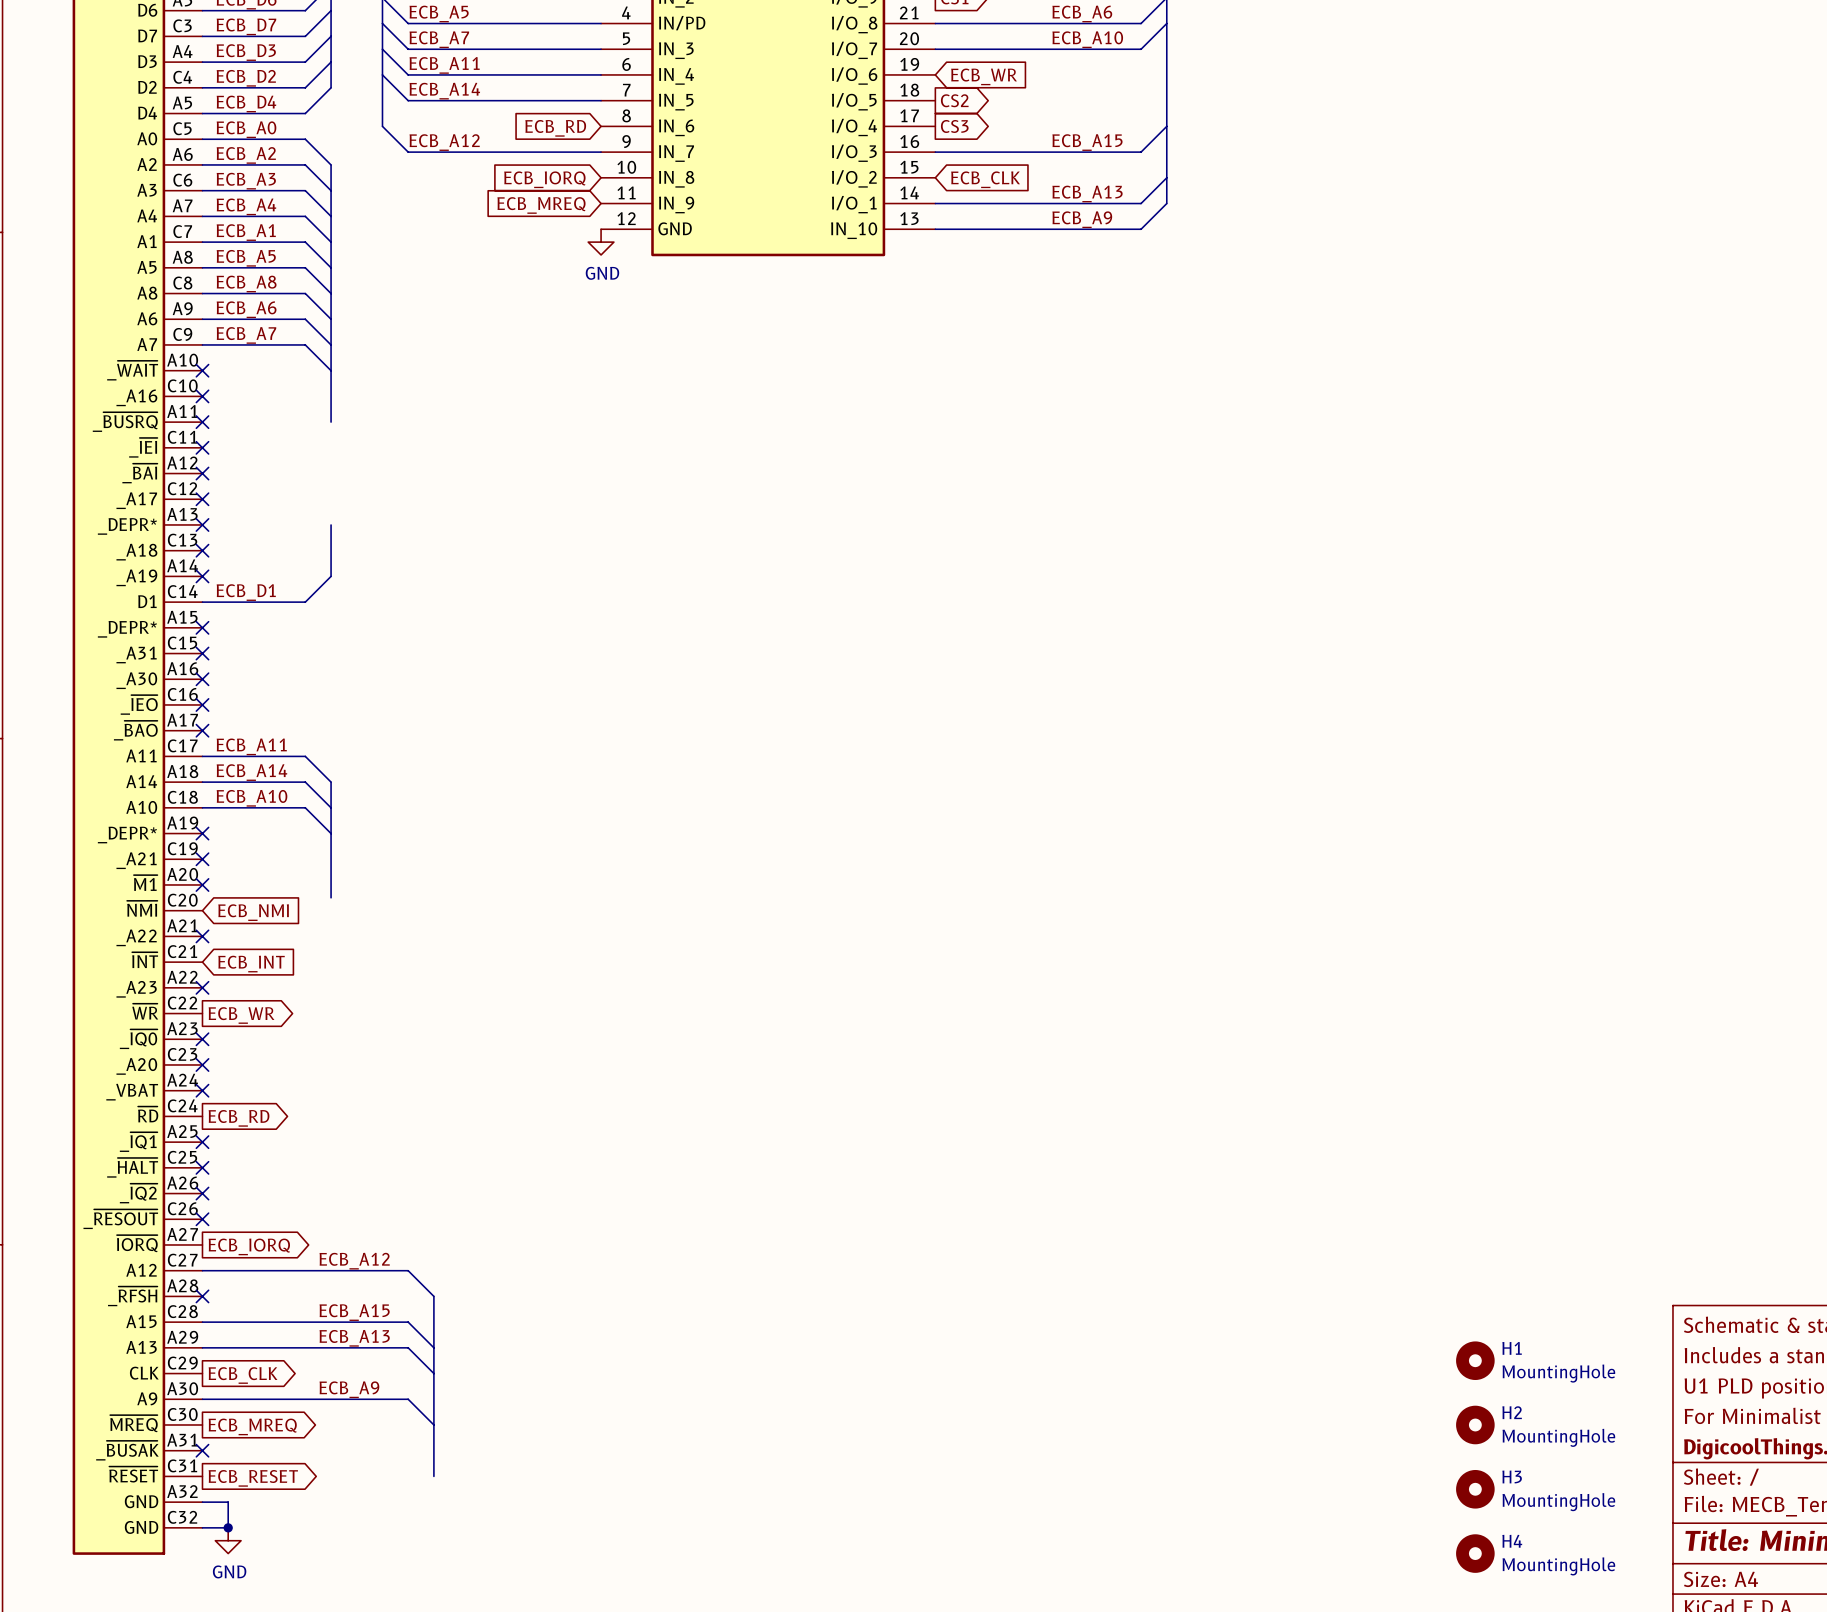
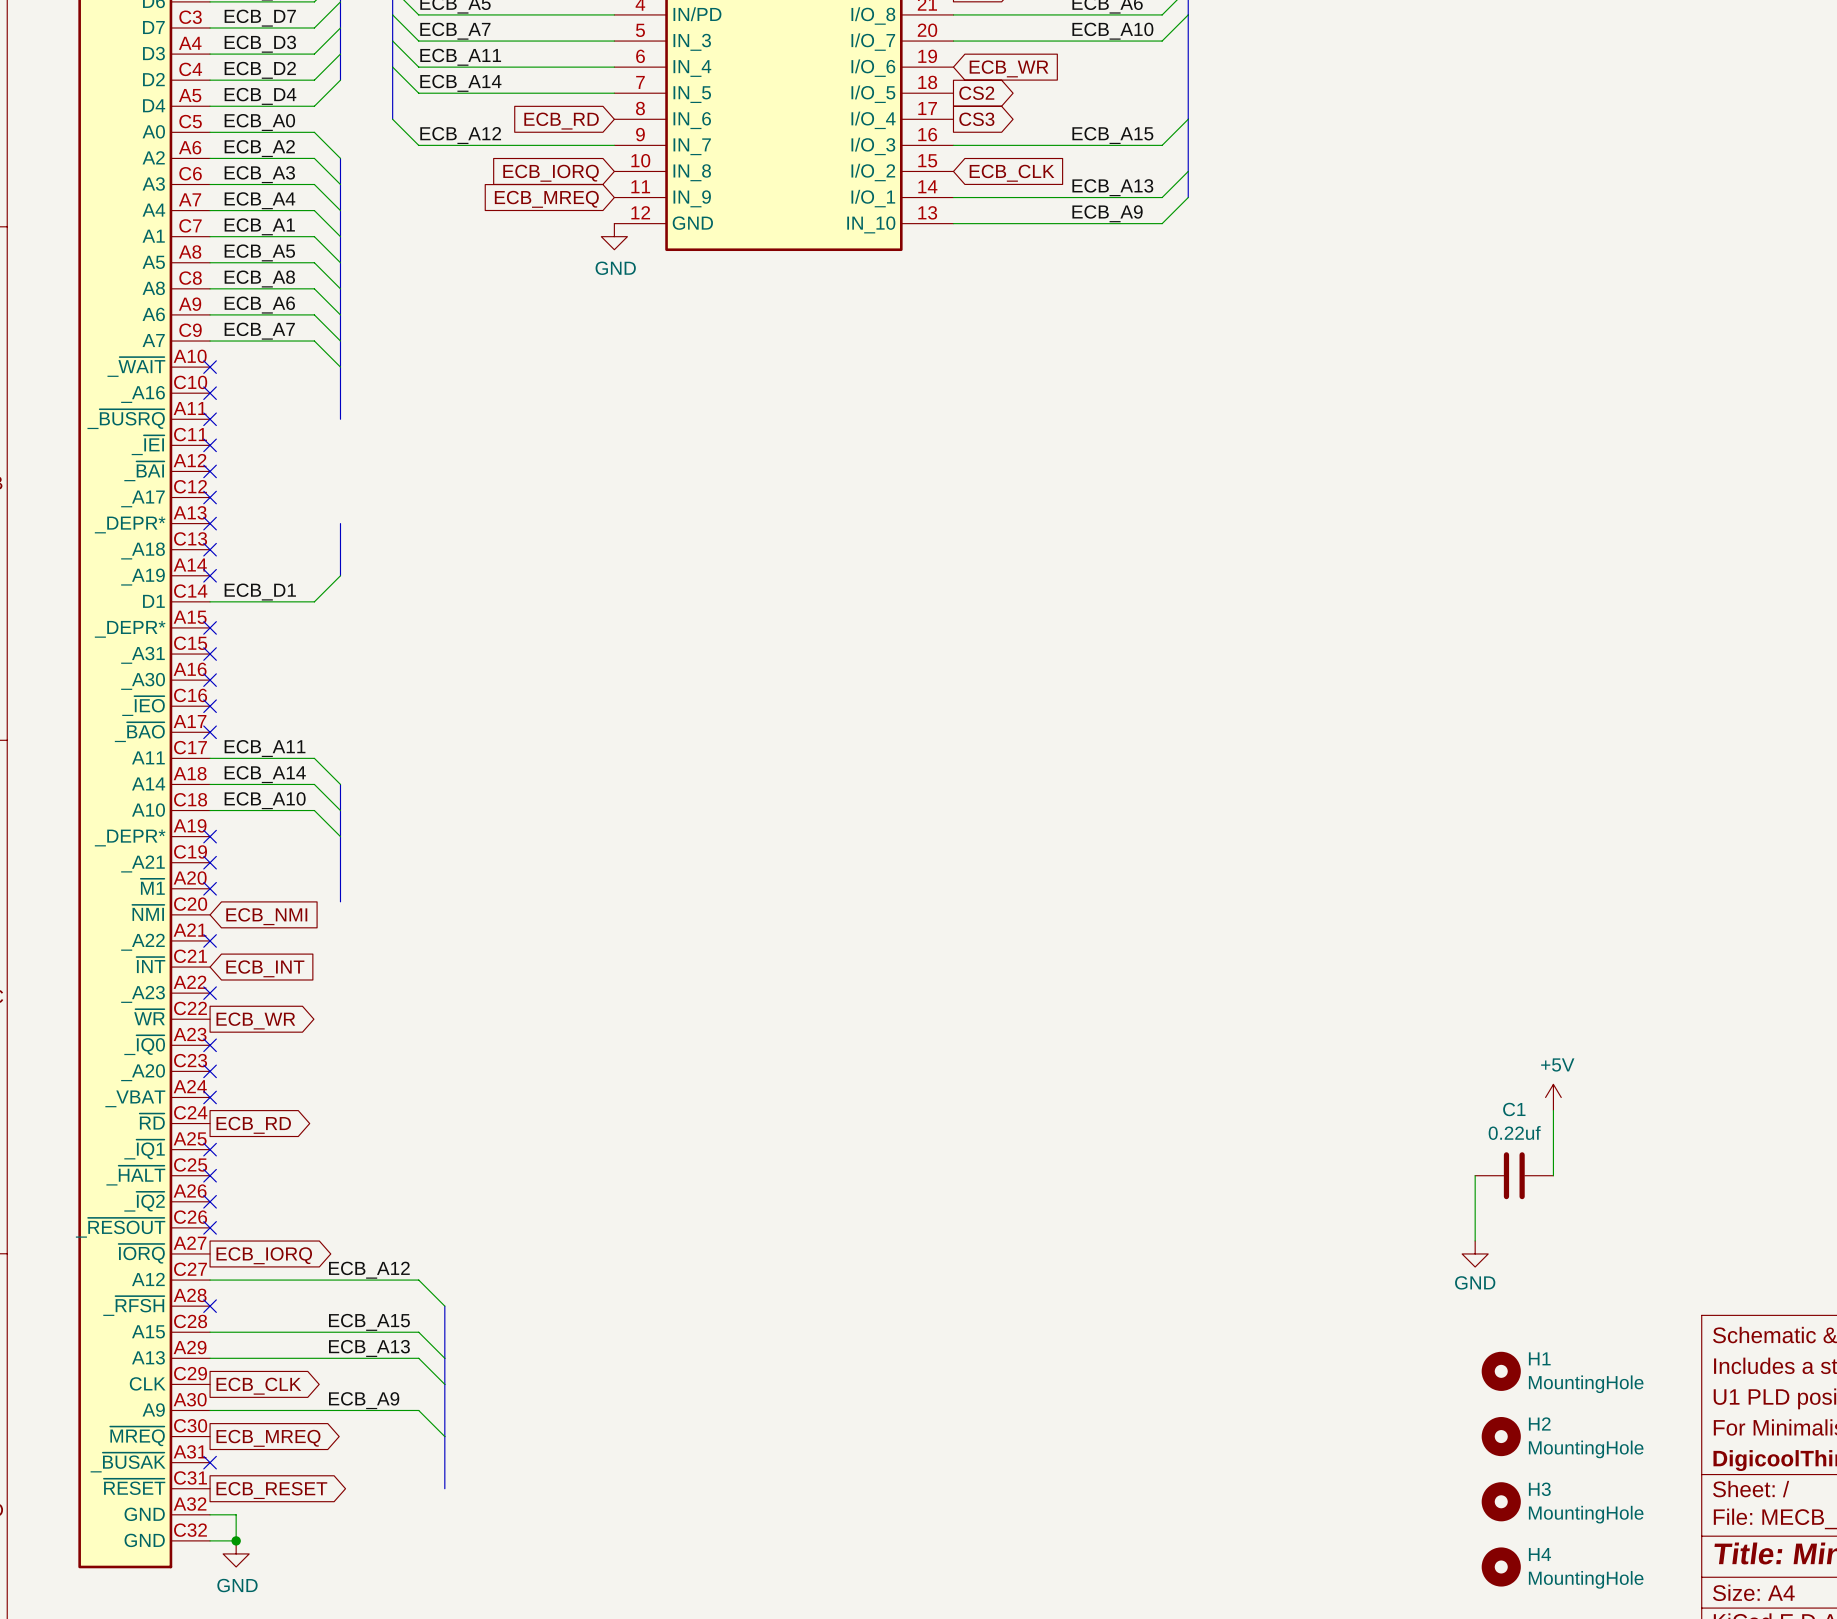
power symbol: none -> +5V (1553, 1097)
wire: none -> (1553, 1110) (1553, 1175)
wire: none -> (1475, 1175) (1475, 1240)
C1: none -> 0.22uf (1514, 1175)
power symbol: none -> GND (1475, 1253)

